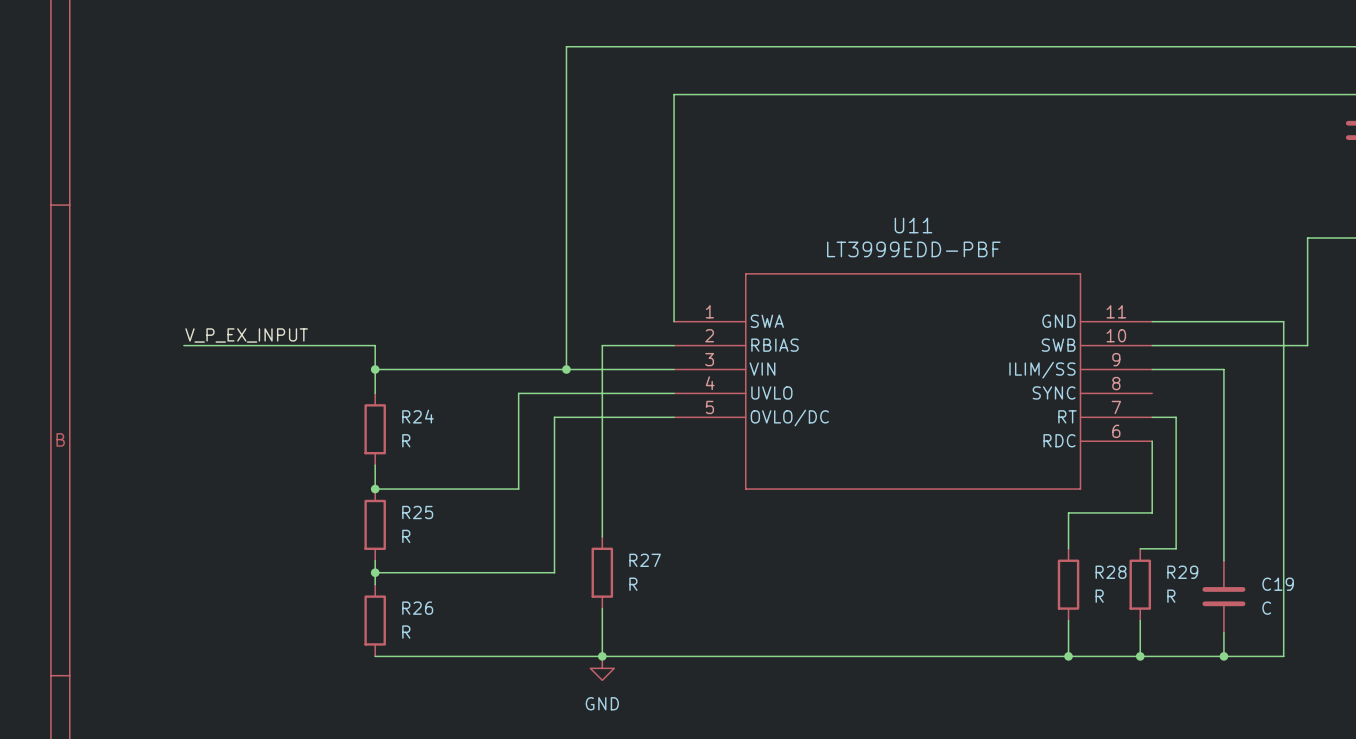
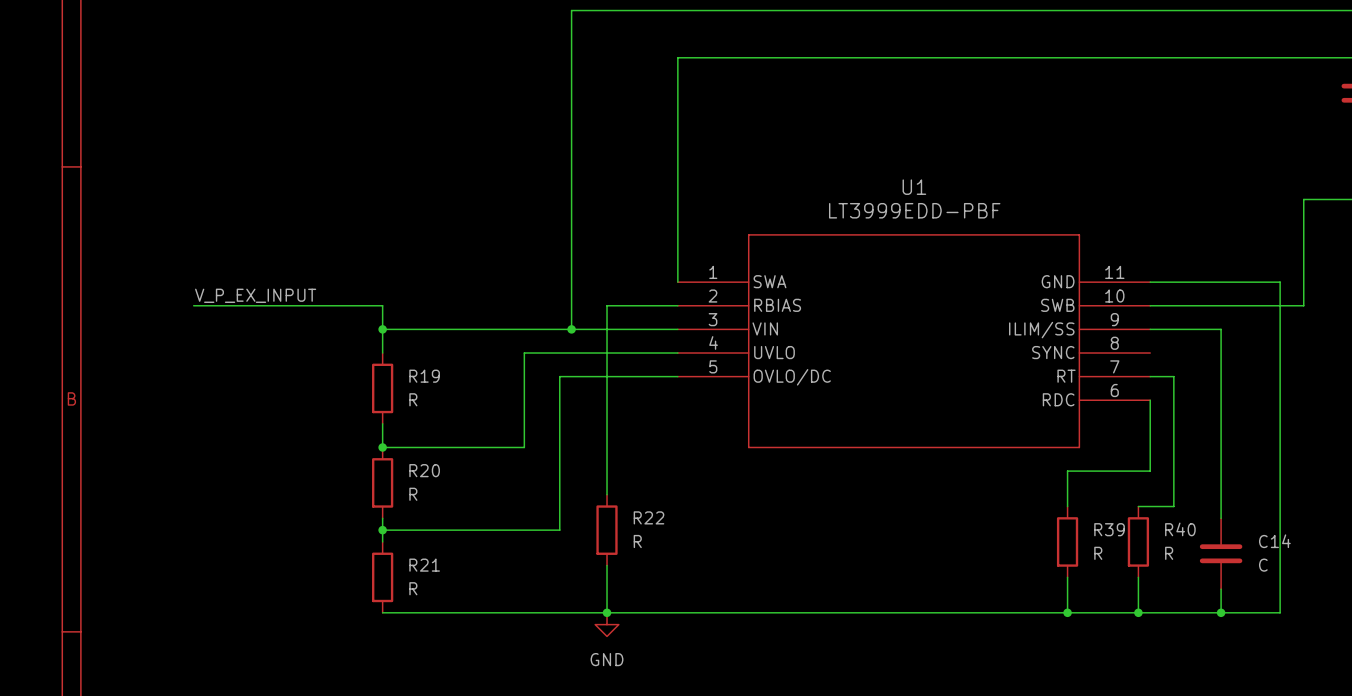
U11 name: U11 (913, 225) -> U1 (914, 187)
R24 name: R24 (417, 416) -> R19 (424, 376)
R25 name: R25 (417, 512) -> R20 (424, 470)
R27 name: R27 (645, 560) -> R22 (648, 517)
R28 name: R28 (1111, 572) -> R39 (1109, 529)
R29 name: R29 (1182, 572) -> R40 (1180, 529)
C19 name: C19 (1278, 584) -> C14 (1274, 541)
R26 name: R26 (417, 608) -> R21 (424, 565)

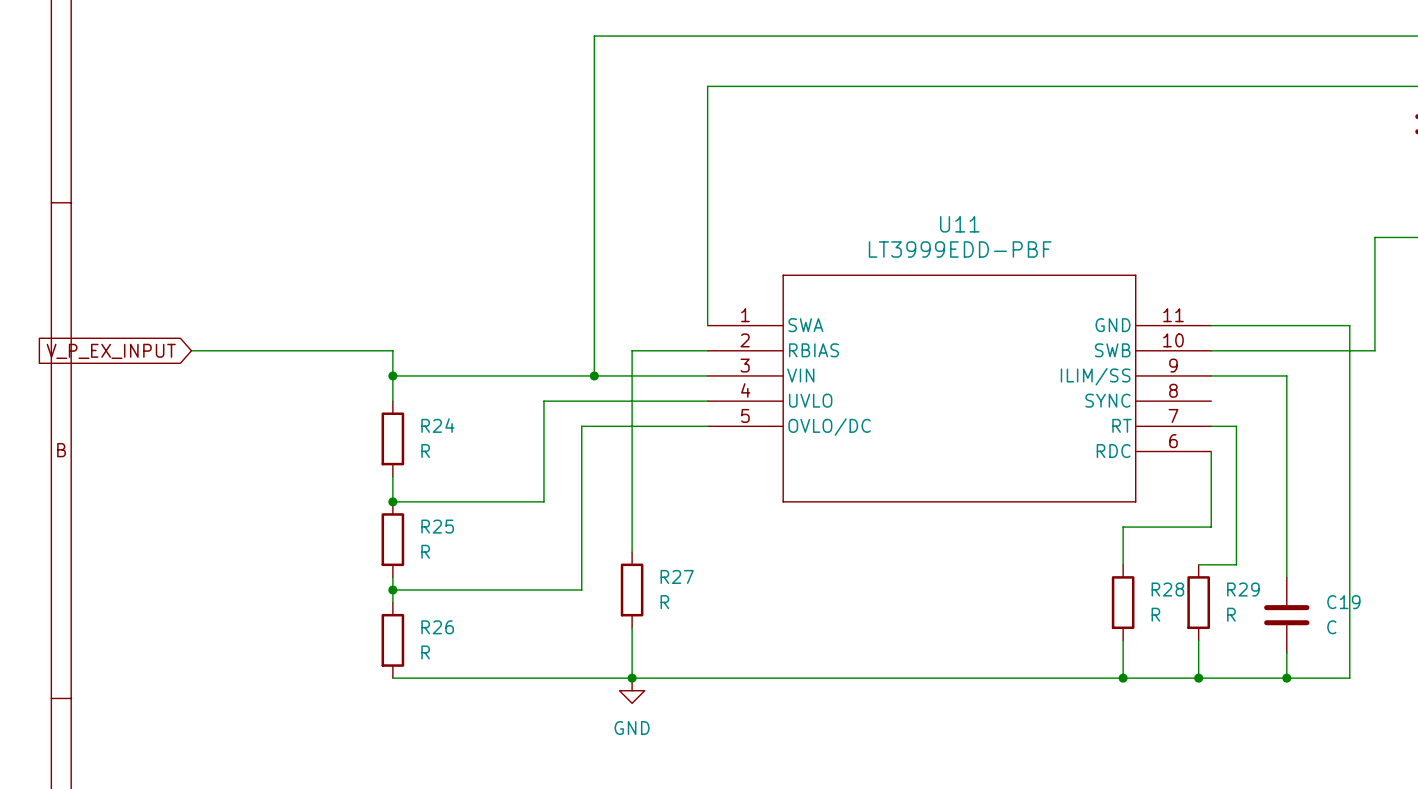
U1 name: U1 (914, 187) -> U11 (959, 224)
label: V_P_EX_INPUT (255, 295) -> none
global label: none -> V_P_EX_INPUT (111, 351)
R19 name: R19 (424, 376) -> R24 (437, 425)
R20 name: R20 (424, 470) -> R25 (437, 526)
R22 name: R22 (648, 517) -> R27 (677, 576)
R39 name: R39 (1109, 529) -> R28 (1167, 589)
R40 name: R40 (1180, 529) -> R29 (1243, 589)
C14 name: C14 (1274, 541) -> C19 (1343, 602)
R21 name: R21 (424, 565) -> R26 (437, 627)

